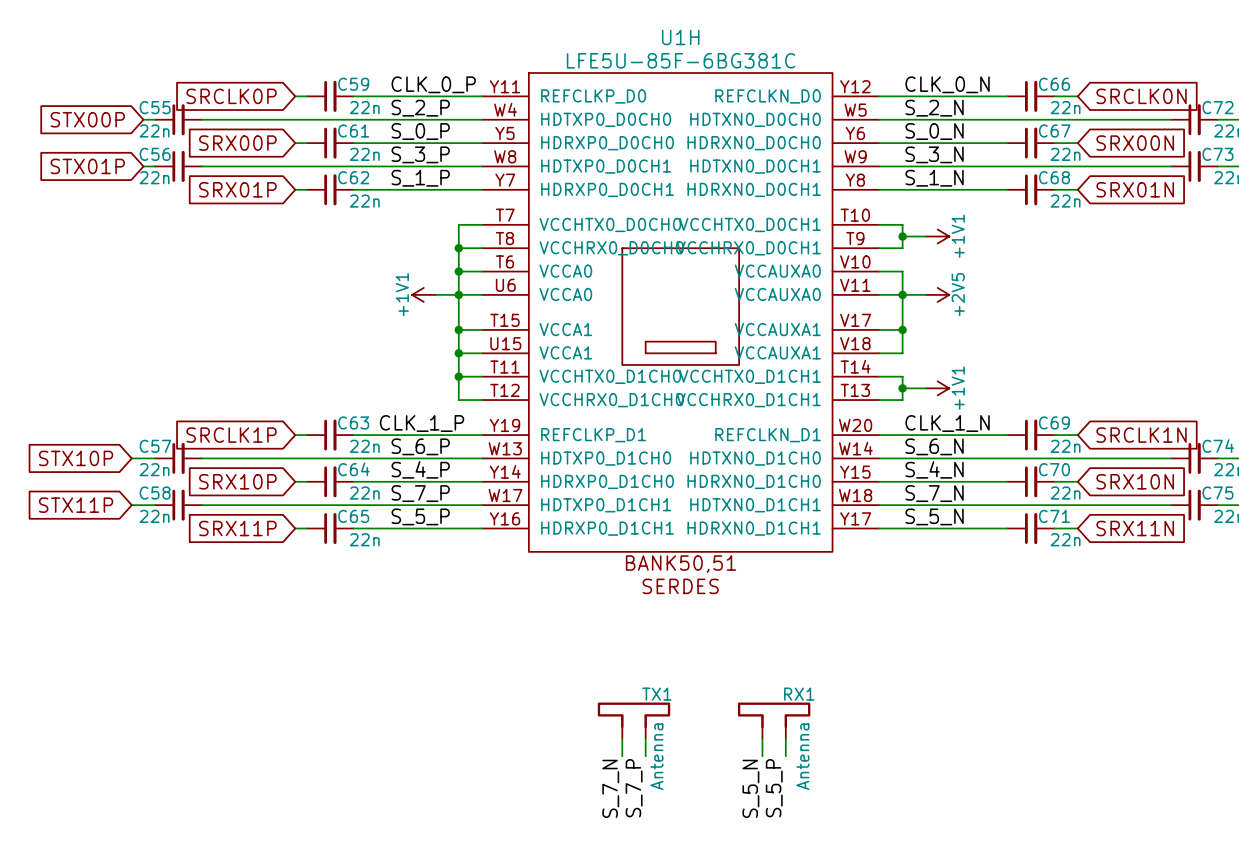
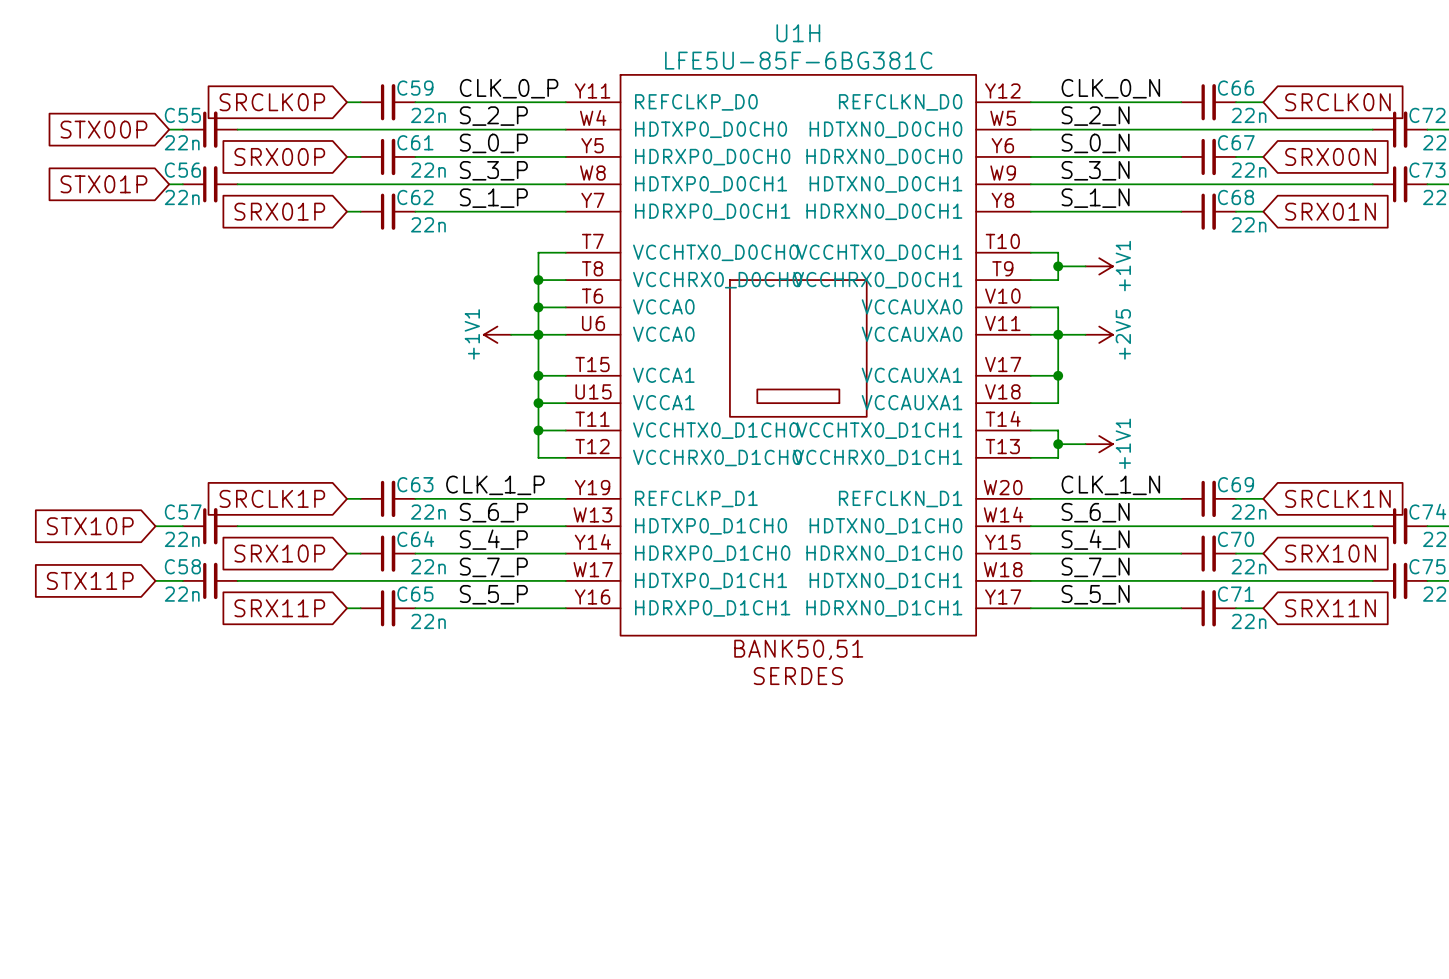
TX1: Antenna (633, 720) -> none
RX1: Antenna (774, 720) -> none
wire: (622, 738) (622, 756) -> none
wire: (645, 738) (645, 756) -> none
wire: (762, 738) (762, 756) -> none
wire: (785, 738) (785, 756) -> none
label: S_7_N (610, 788) -> none
label: S_7_P (634, 788) -> none
label: S_5_N (750, 788) -> none
label: S_5_P (774, 788) -> none

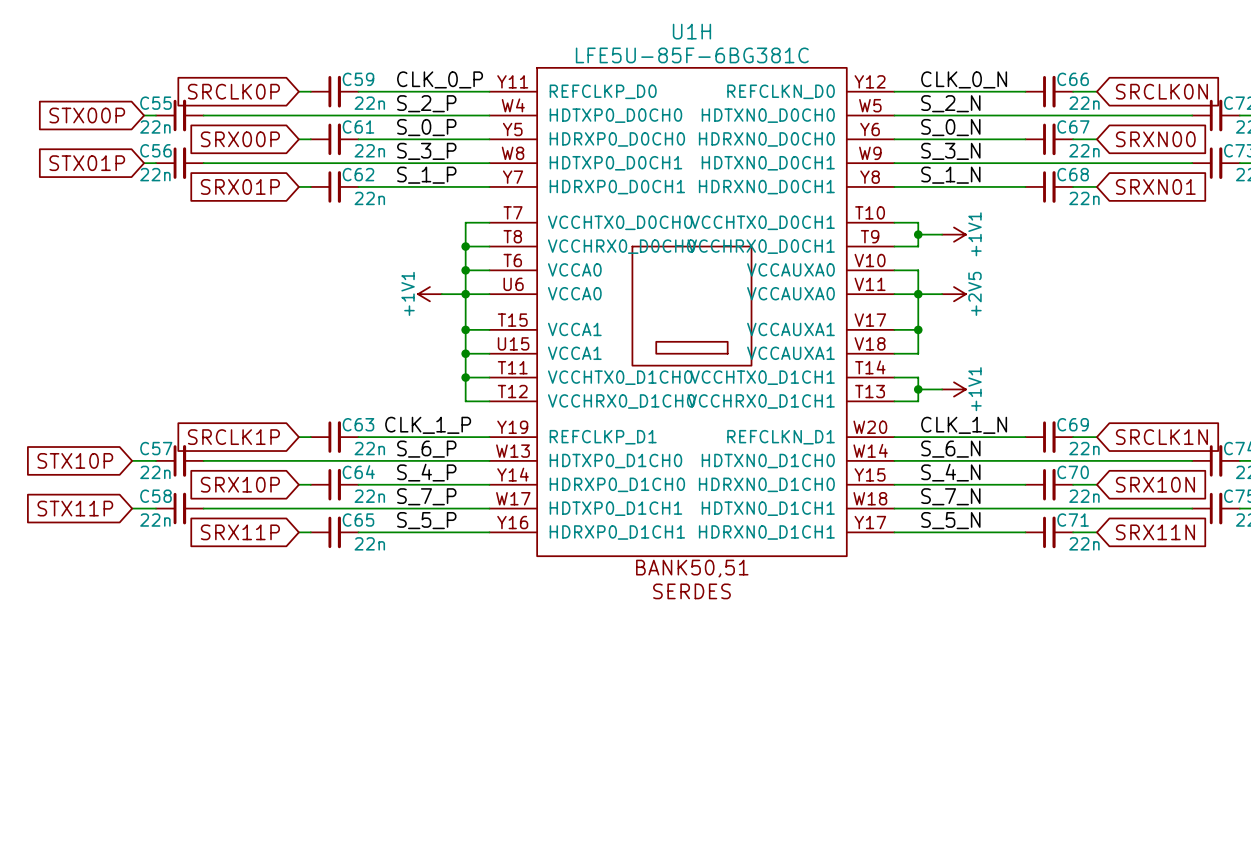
global label: SRX00N (1330, 156) -> SRXN00 (1155, 139)
global label: SRX01N (1330, 211) -> SRXN01 (1155, 186)

